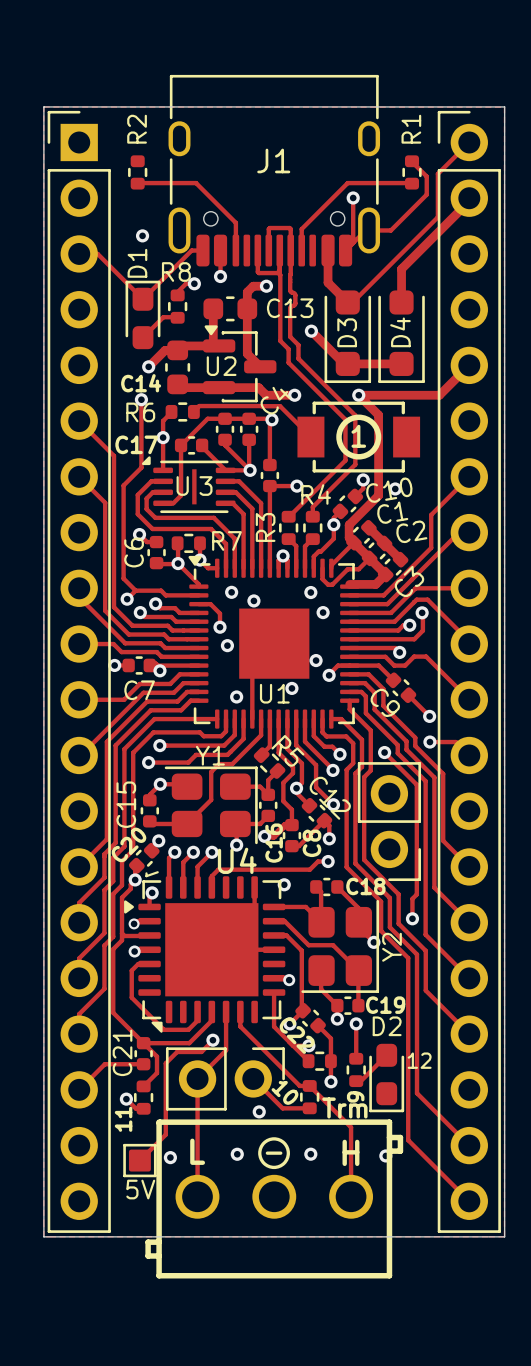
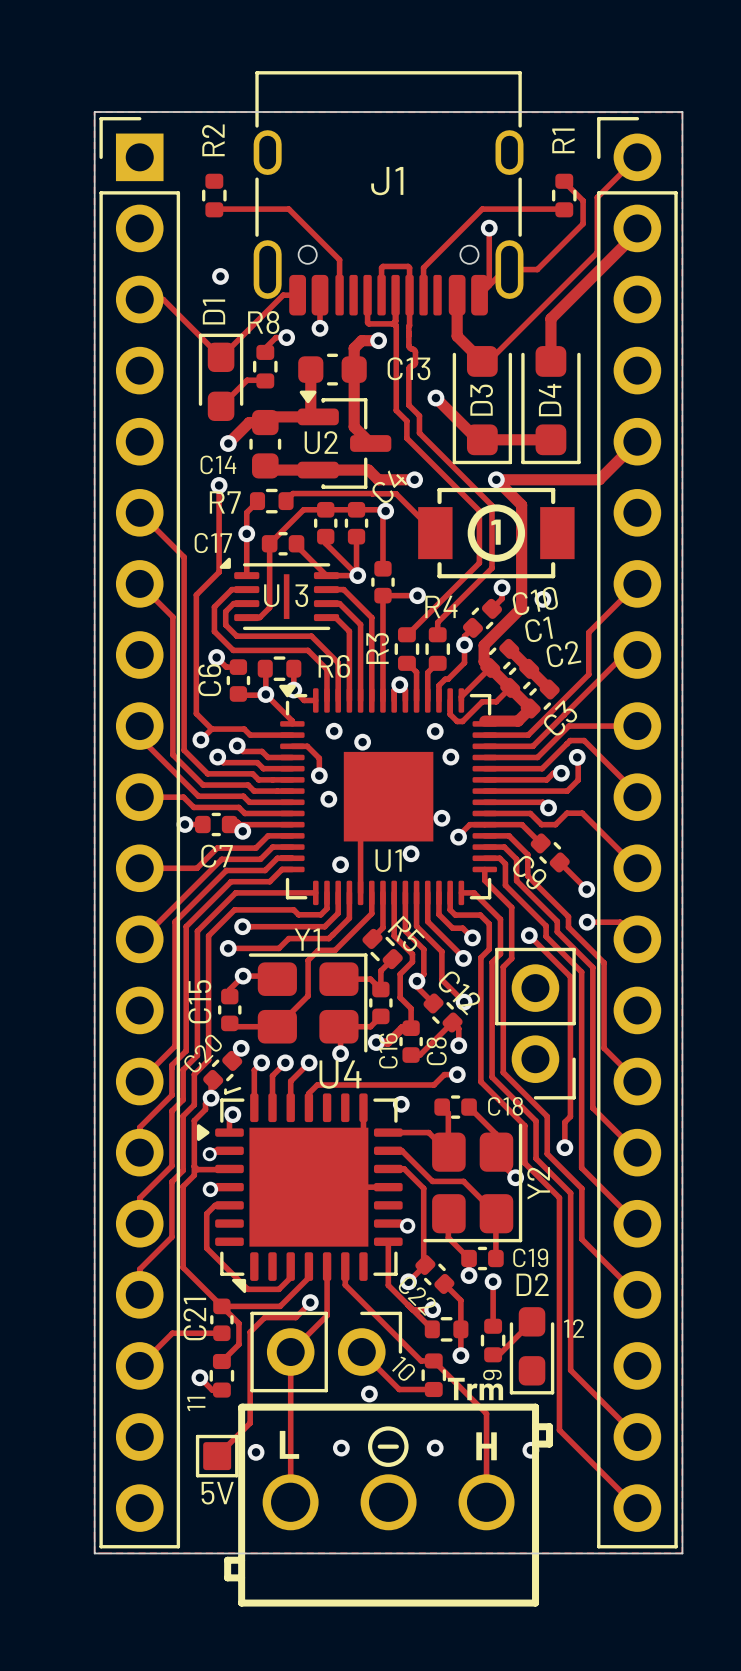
R6 name: R6 (140, 412) -> R7 (225, 502)
R7 name: R7 (226, 540) -> R6 (334, 666)

